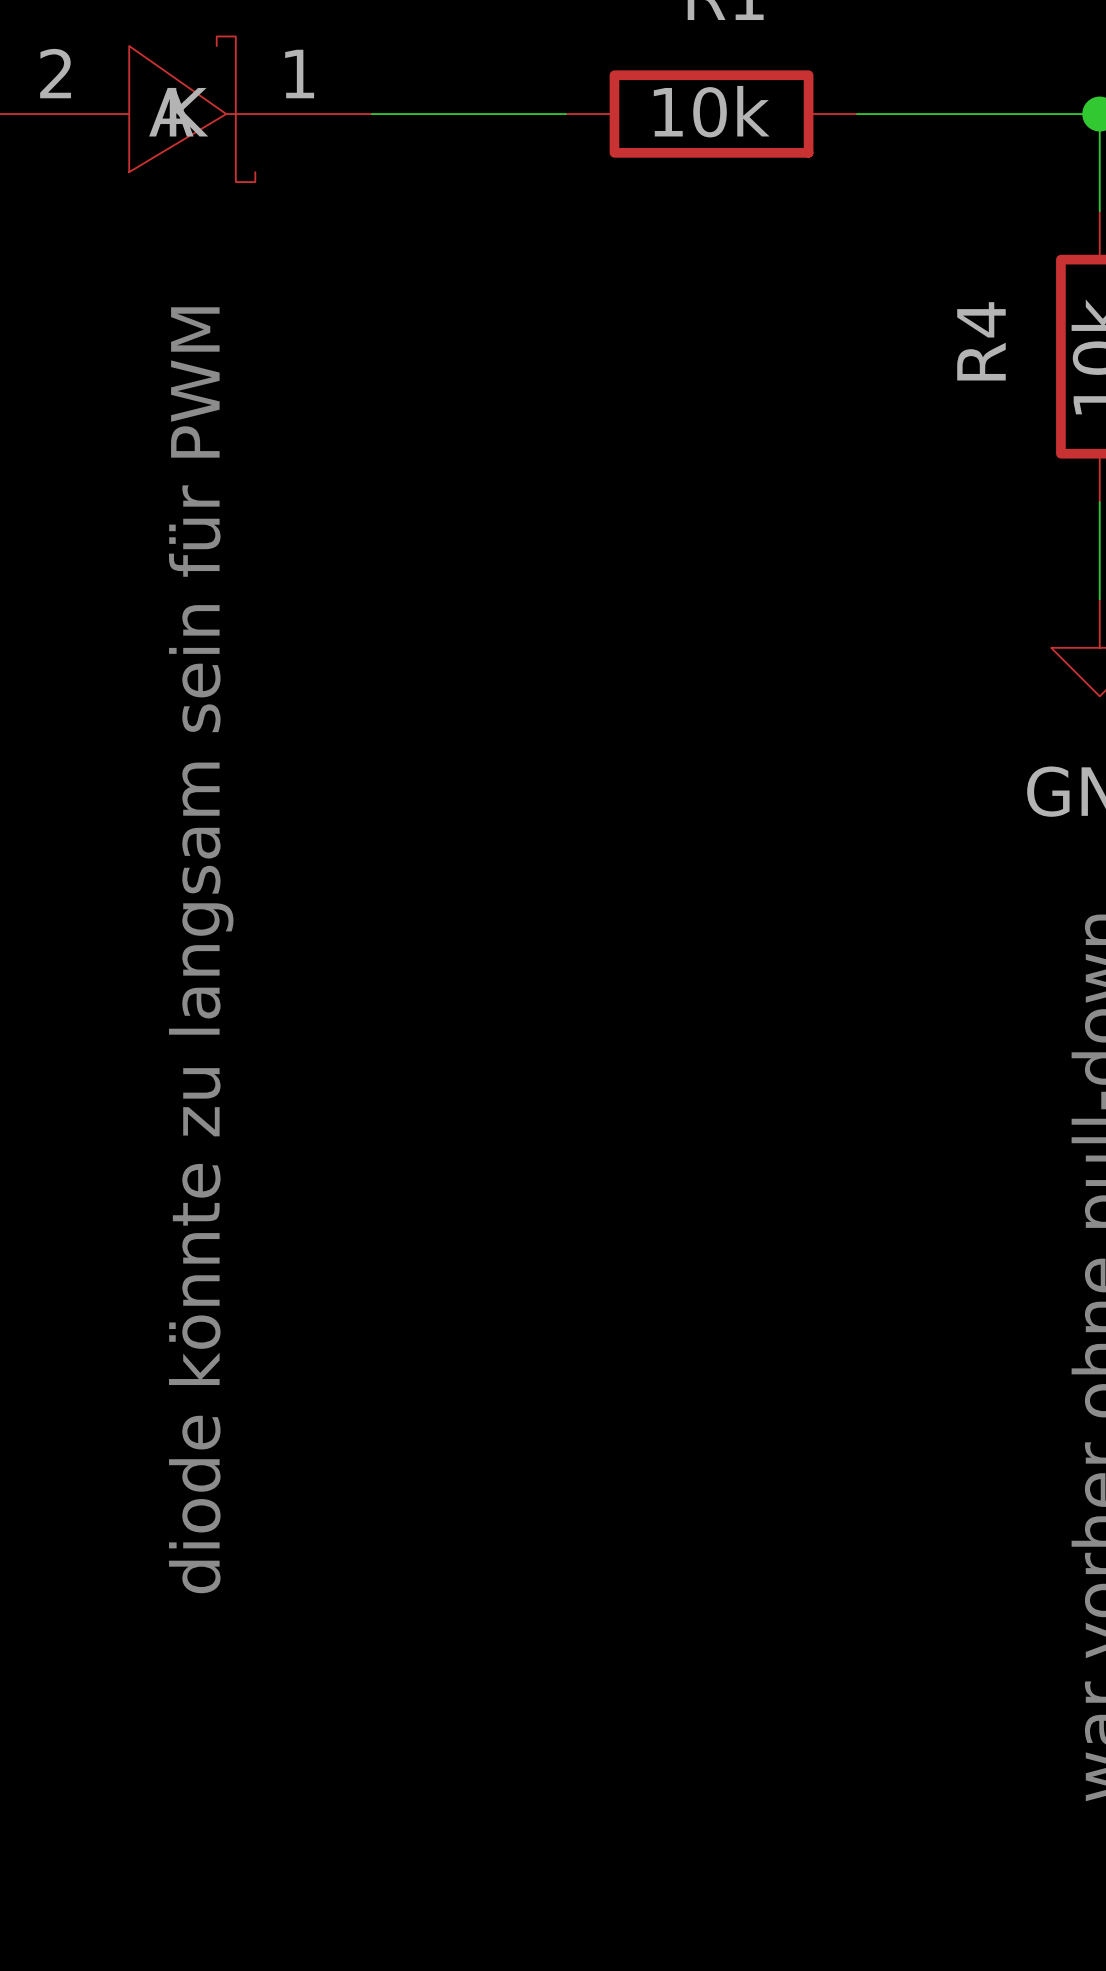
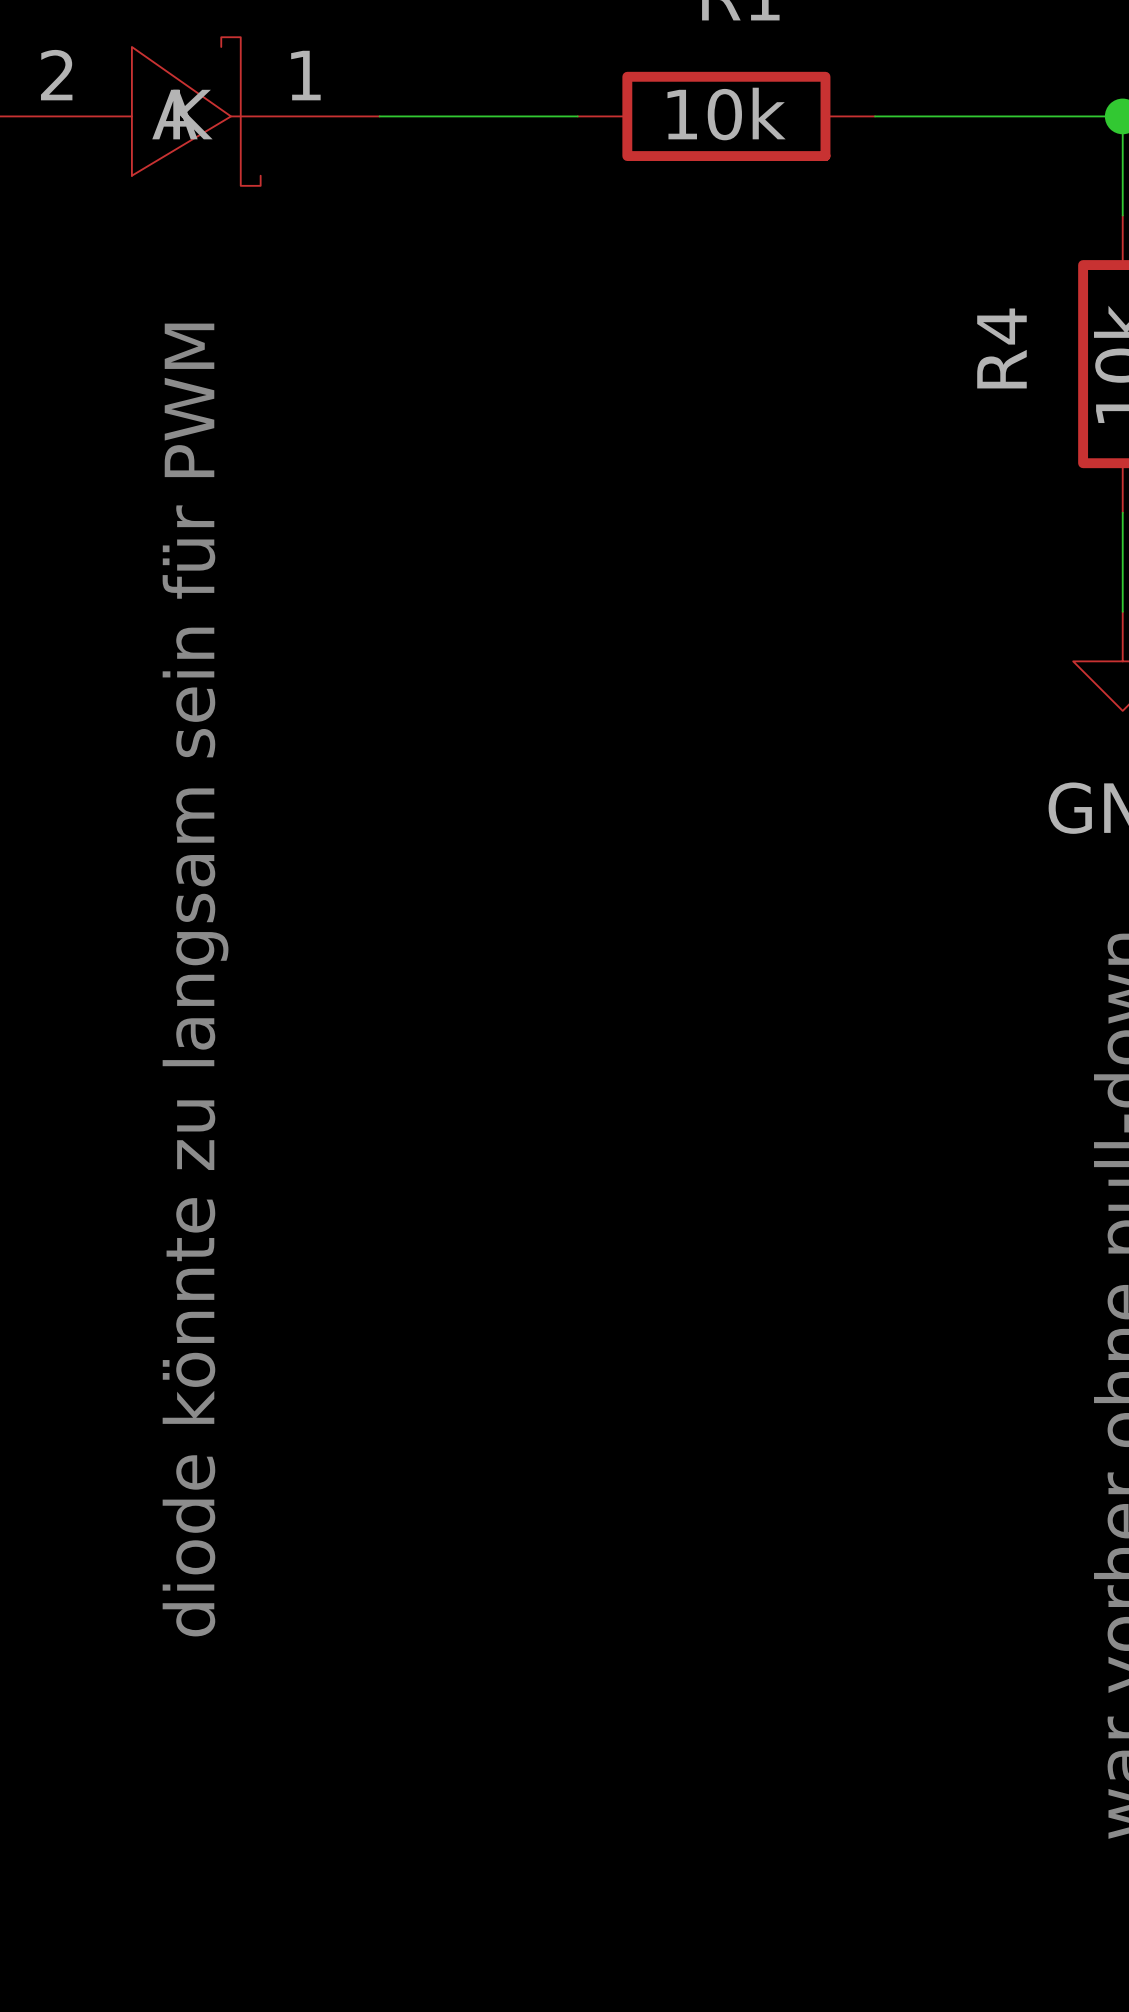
text position: diode könnte zu langsam sein für PWM (201, 950) -> diode könnte zu langsam sein für PWM (195, 980)

